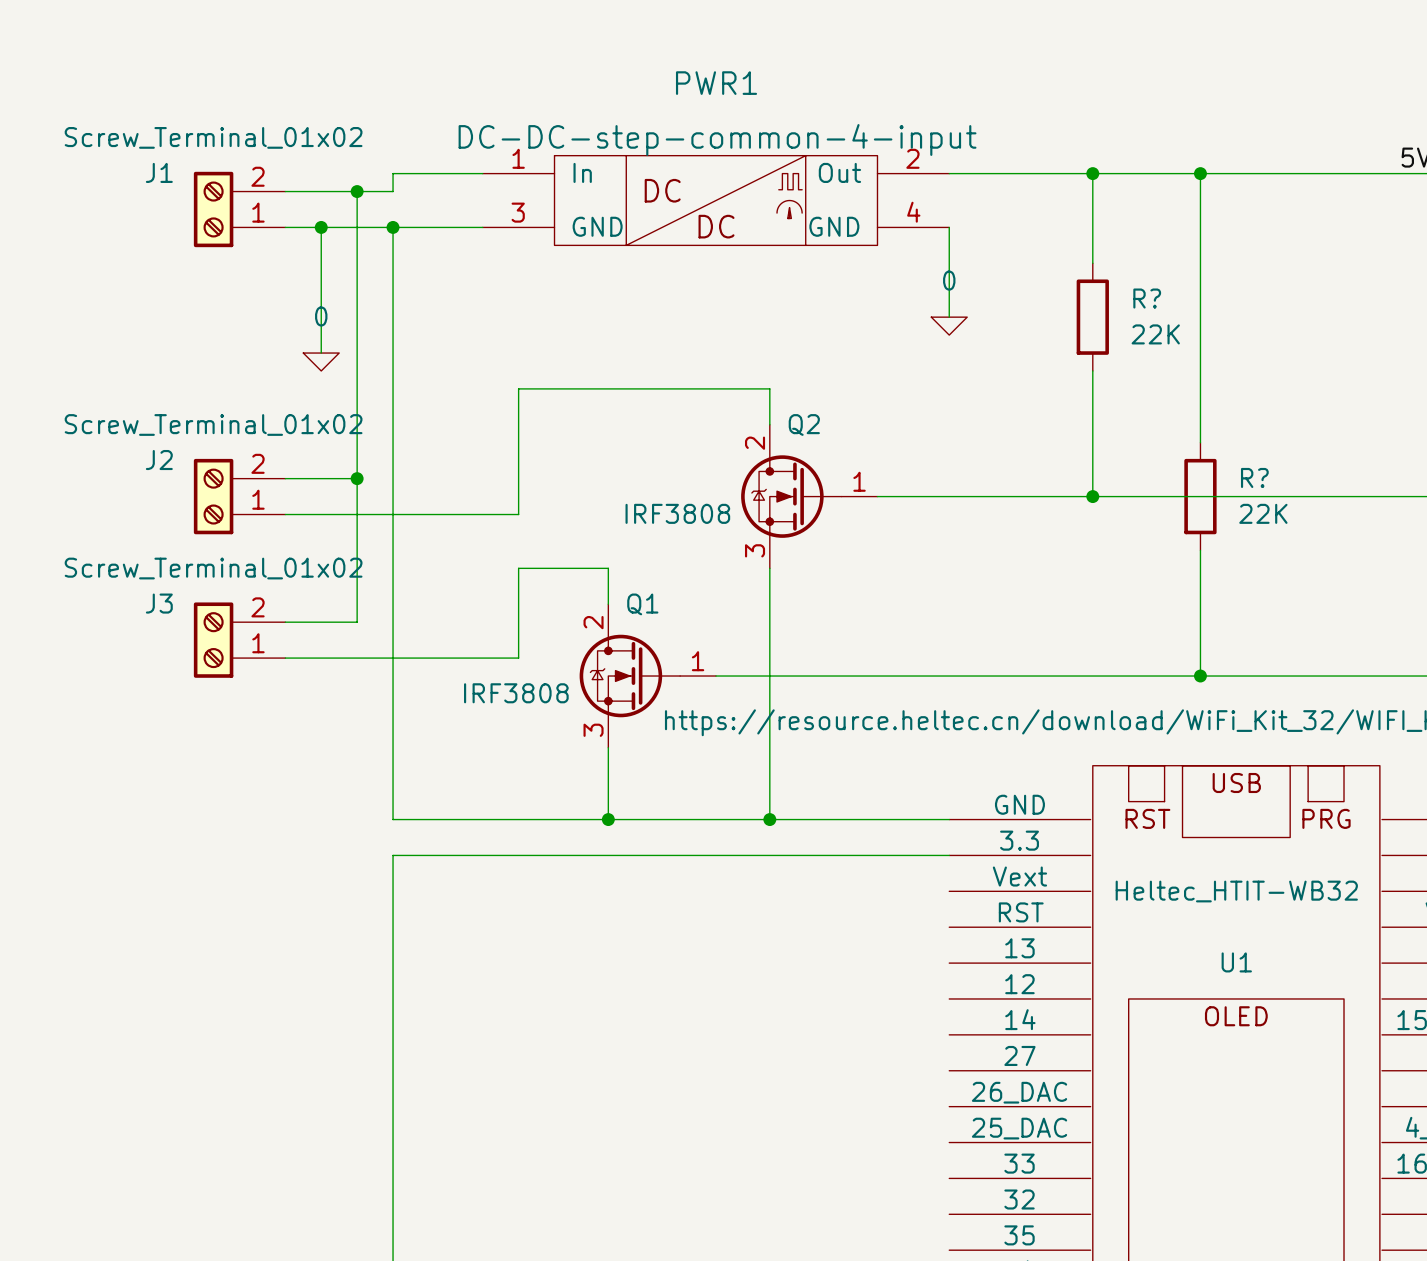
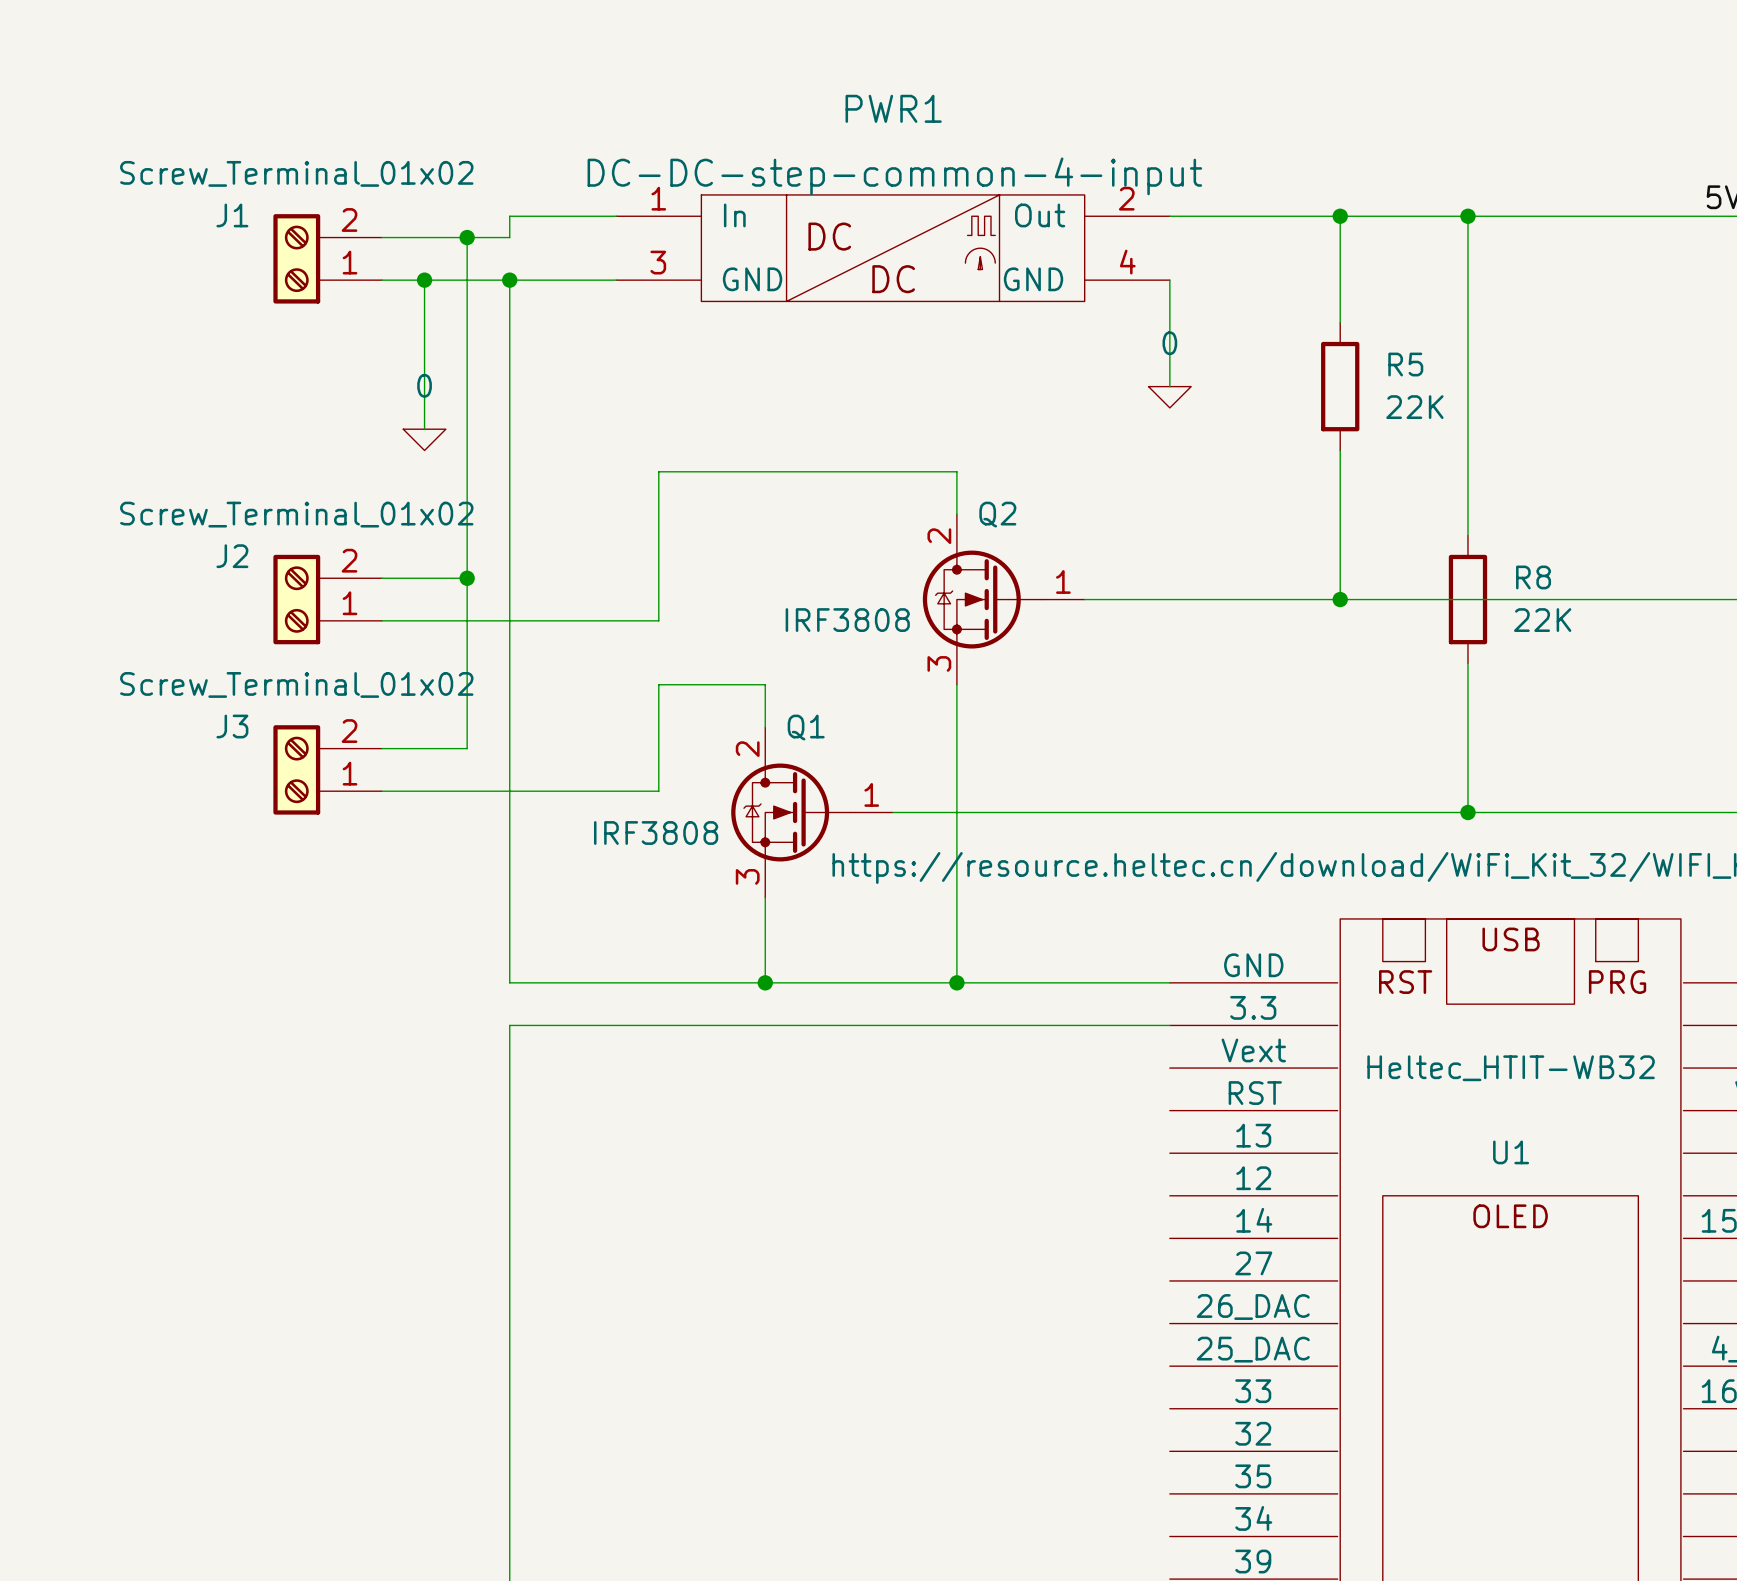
R? name: R? (1147, 298) -> R5 (1405, 364)
R? name: R? (1254, 477) -> R8 (1533, 577)

